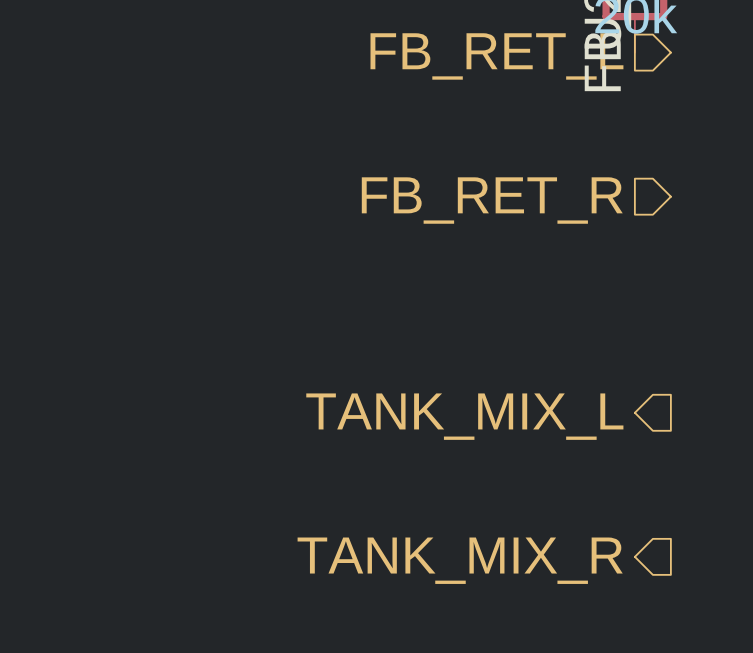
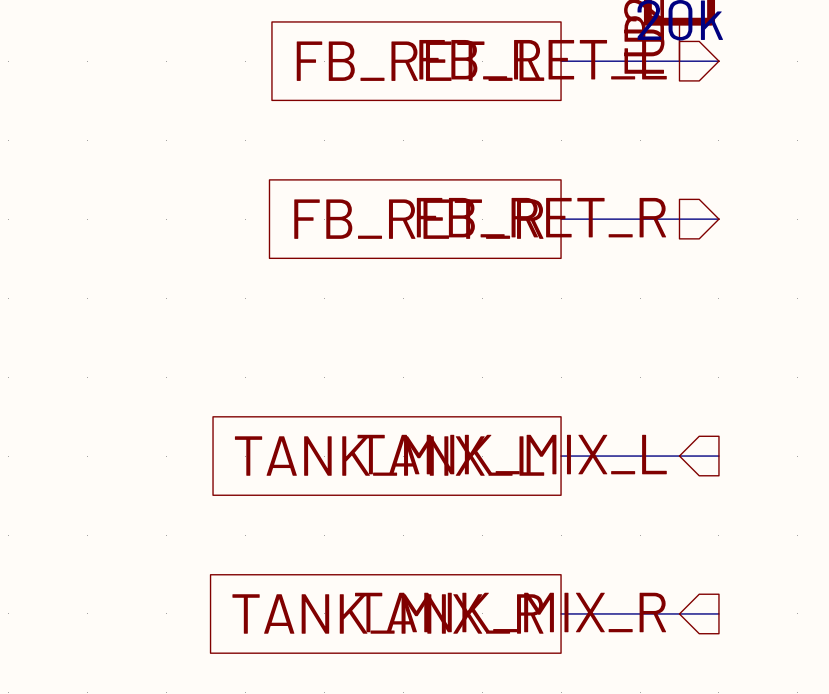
wire: none -> (561, 61) (718, 61)
global label: none -> FB_RET_L (420, 61)
wire: none -> (561, 219) (718, 219)
global label: none -> FB_RET_R (418, 219)
wire: none -> (561, 456) (718, 456)
global label: none -> TANK_MIX_L (389, 456)
wire: none -> (561, 613) (718, 613)
global label: none -> TANK_MIX_R (387, 613)

